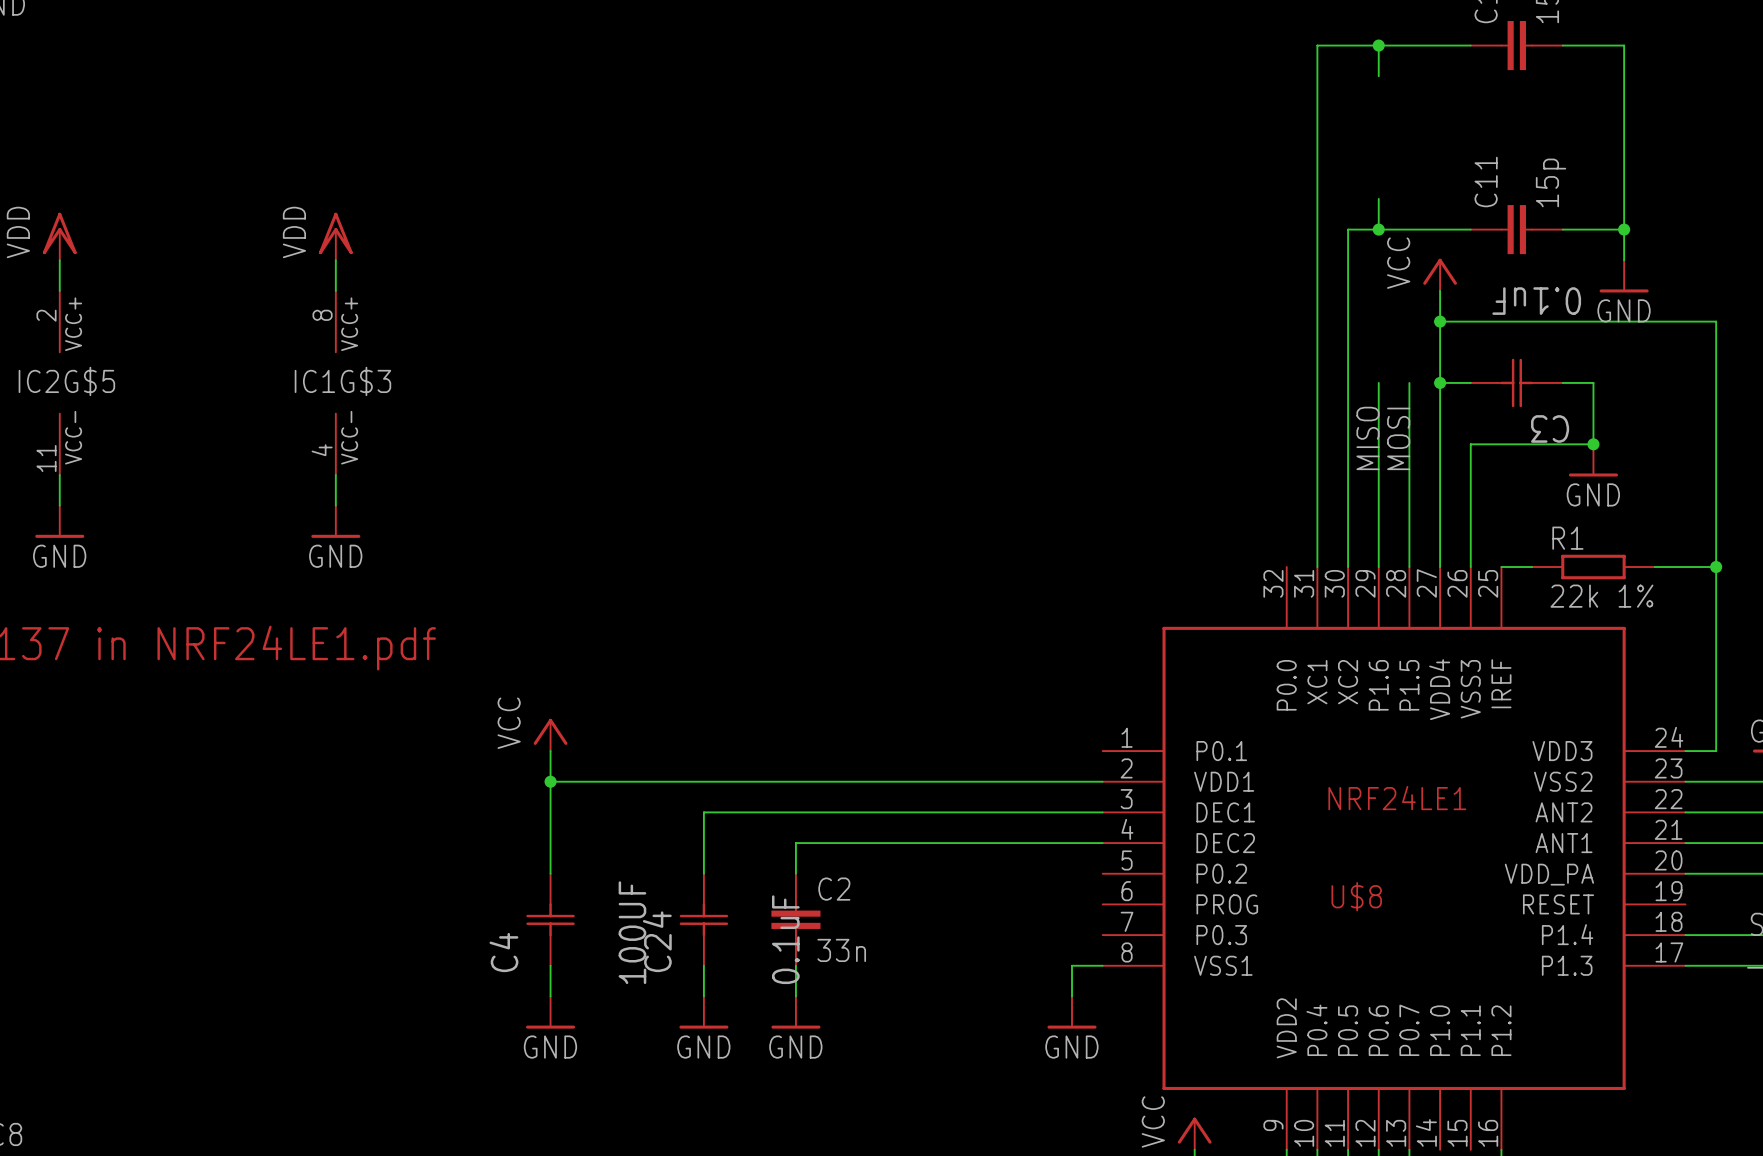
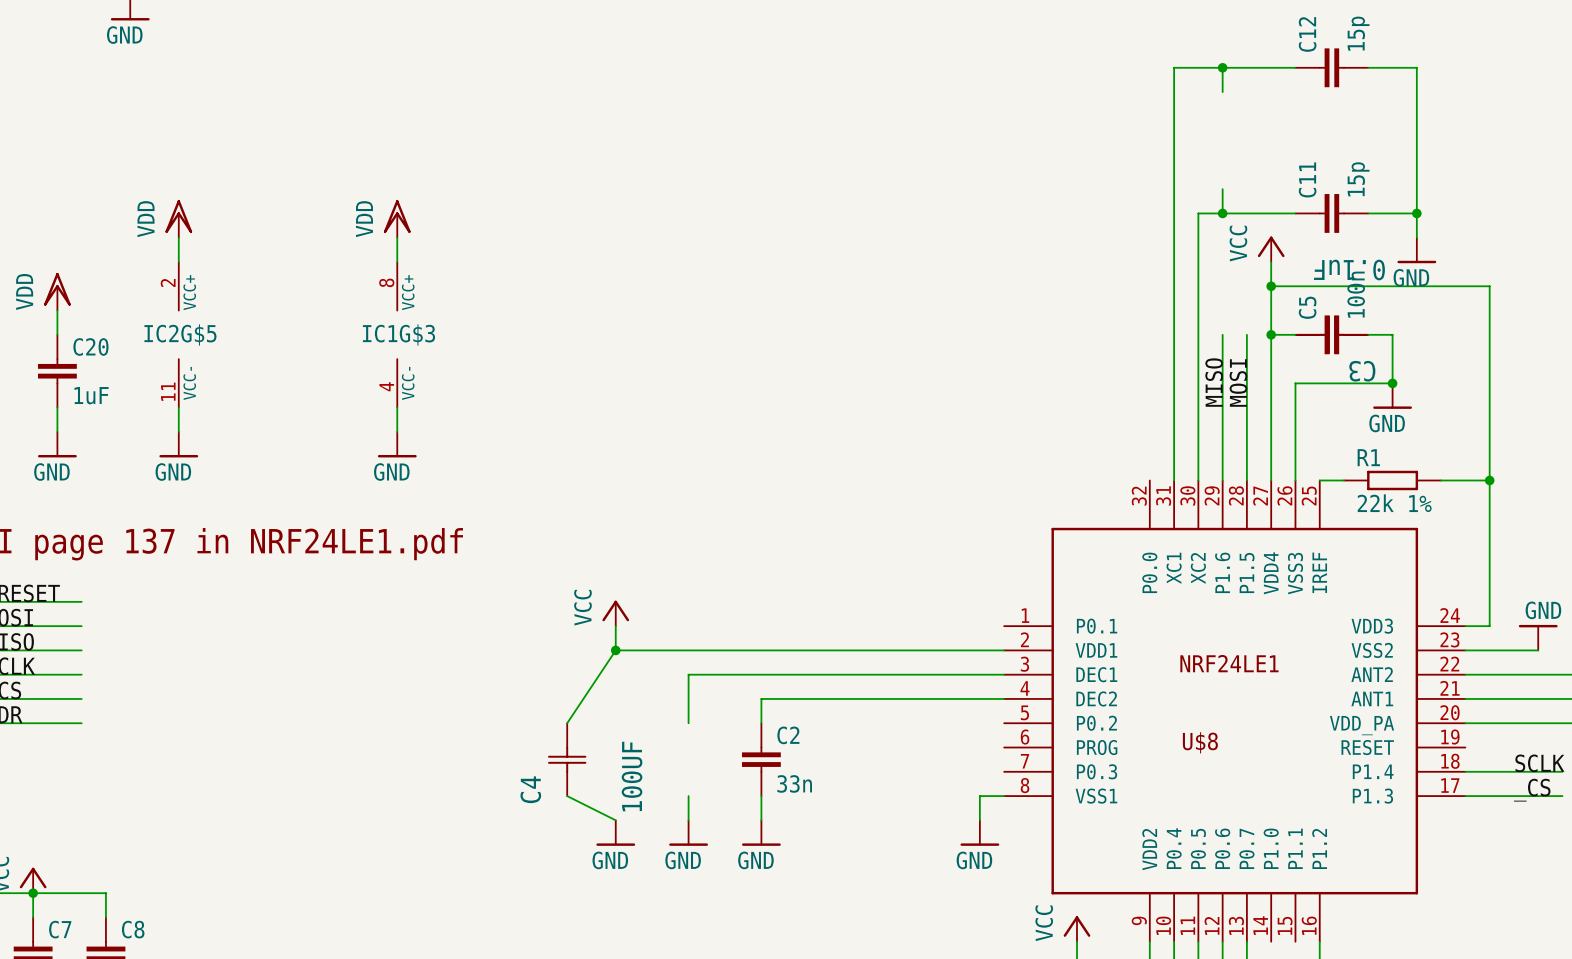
C5: none -> 100n (1331, 334)
power symbol position: VCC (550, 734) -> VCC (615, 613)
wire: (550, 751) (550, 873) -> (615, 626) (615, 650) (567, 723)
wire: (550, 781) (611, 781) -> none
junction position: (550, 781) -> (615, 650)
C24: 0.1uF (703, 919) -> none
wire: (550, 965) (550, 996) -> (567, 796) (615, 820)
power symbol position: GND (550, 1012) -> GND (615, 833)

